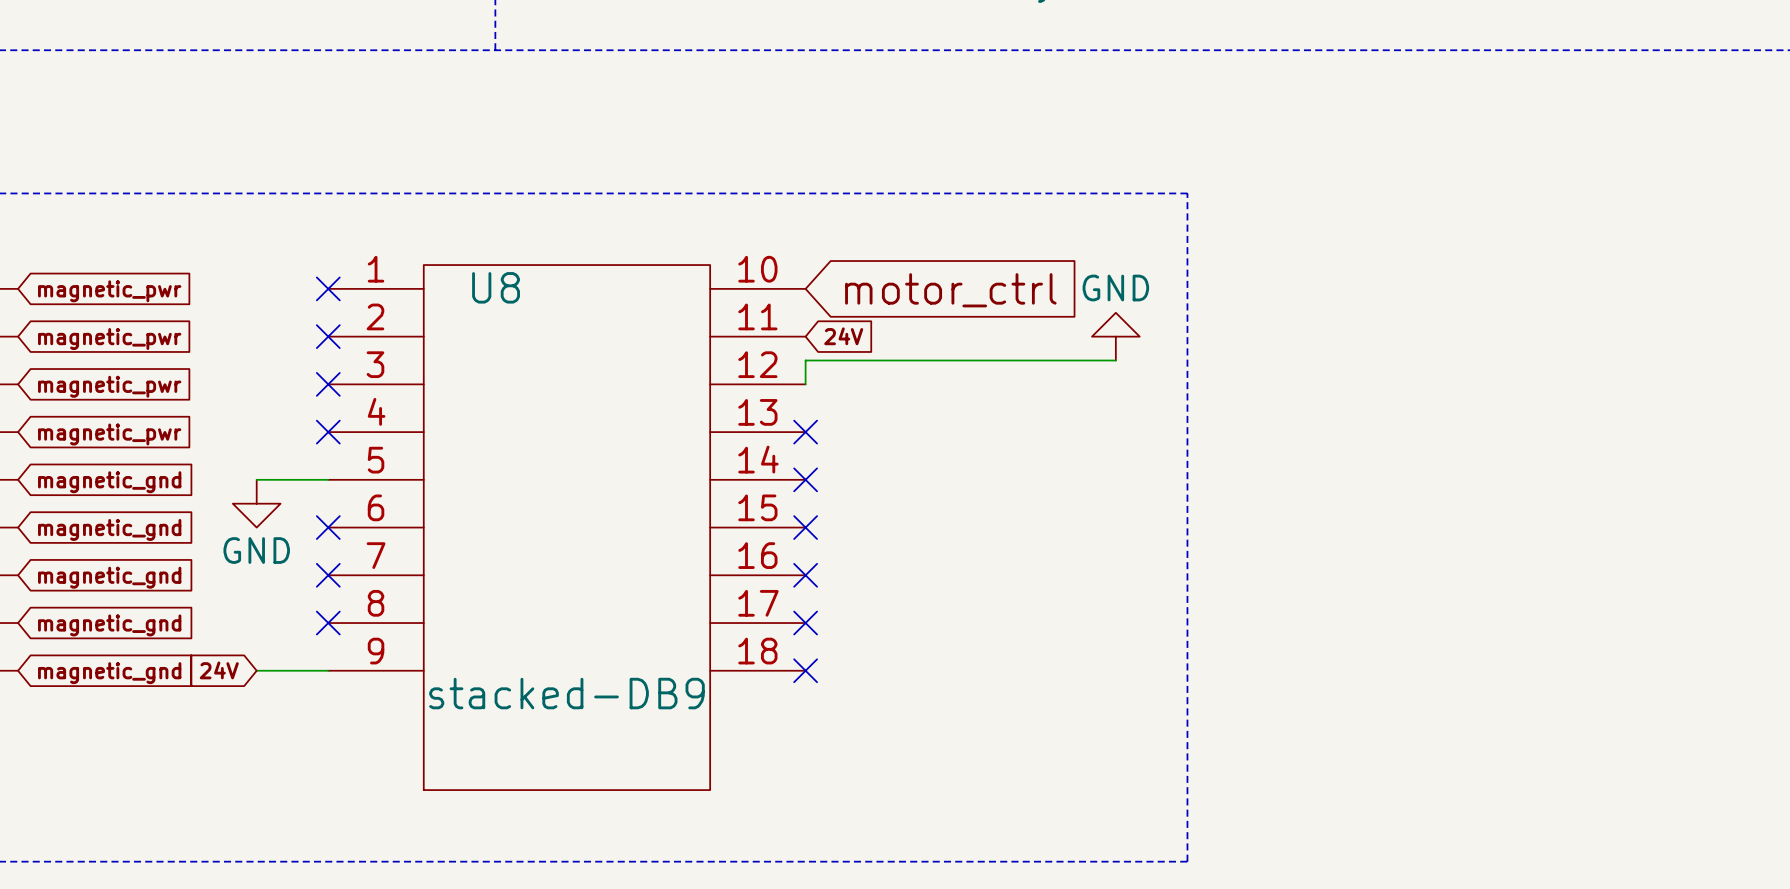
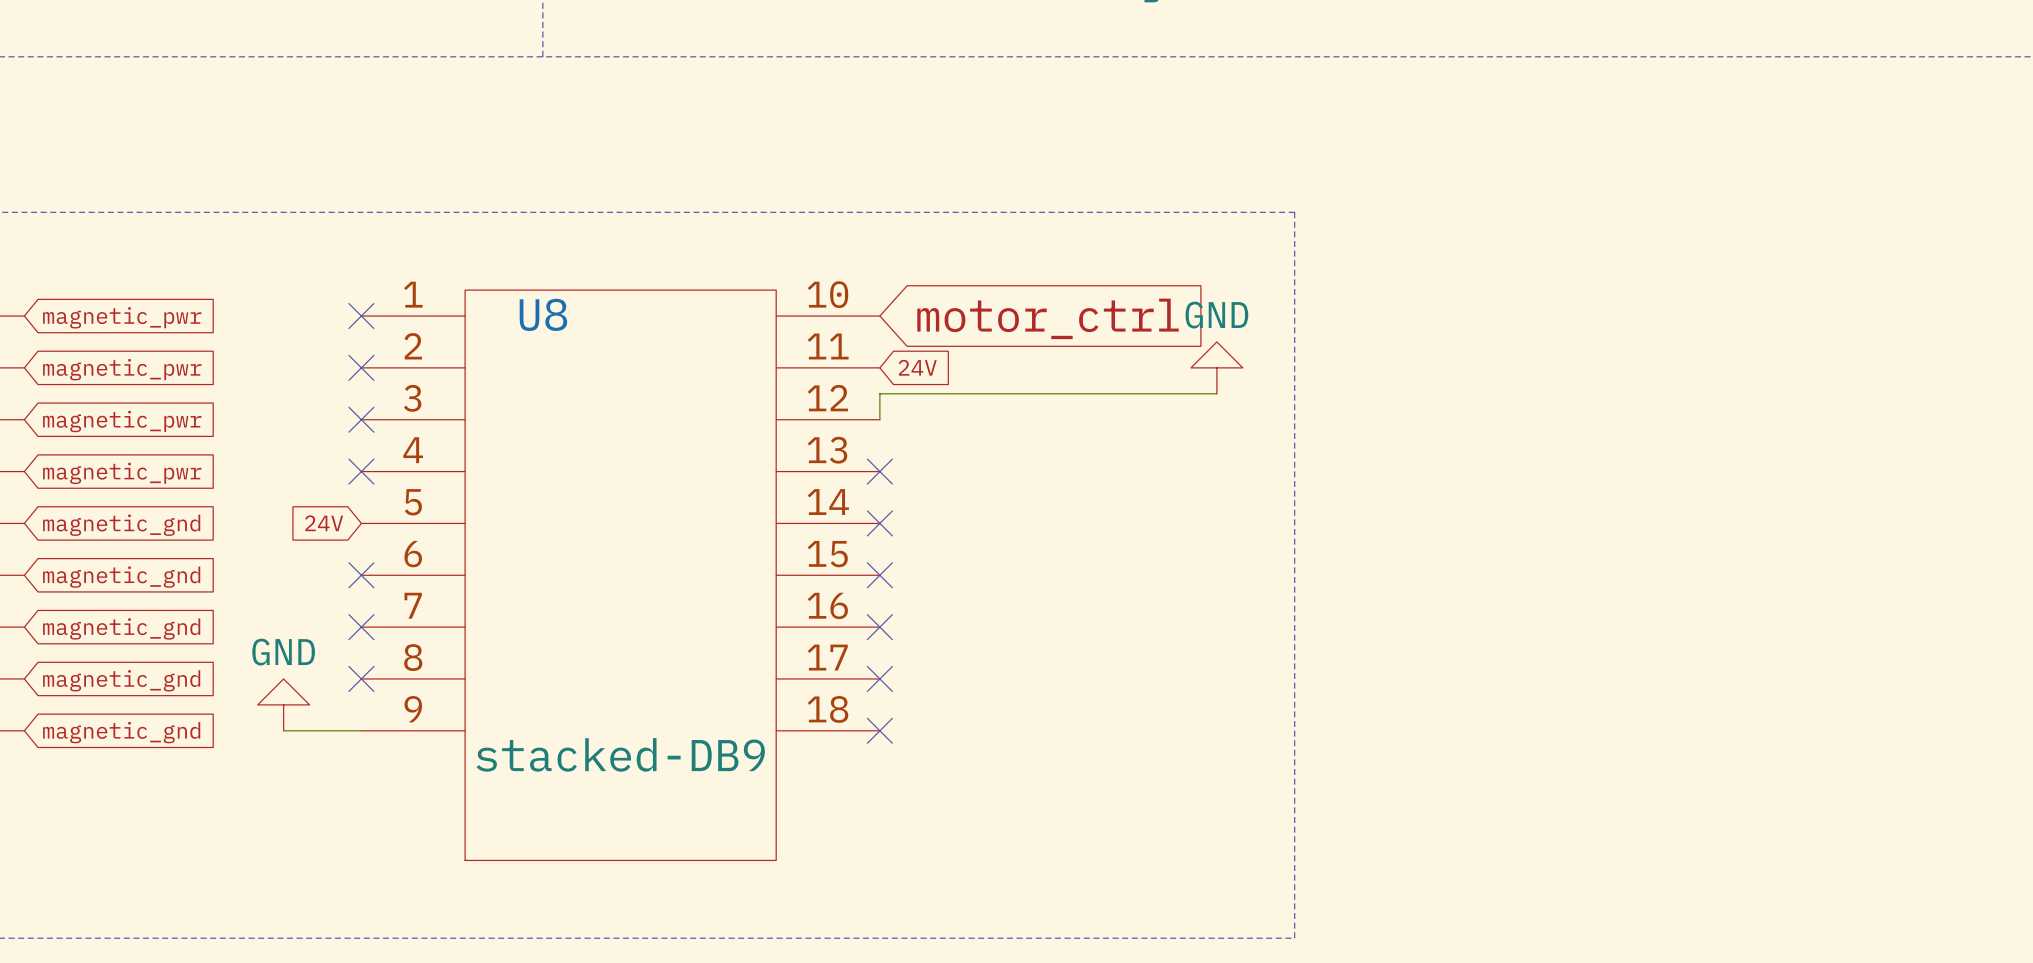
wire: (256, 479) (328, 479) -> none
power symbol rotation: 0° (256, 503) -> 180° (283, 704)
power symbol position: GND (256, 503) -> GND (283, 704)
global label position: 24V (219, 670) -> 24V (324, 523)

